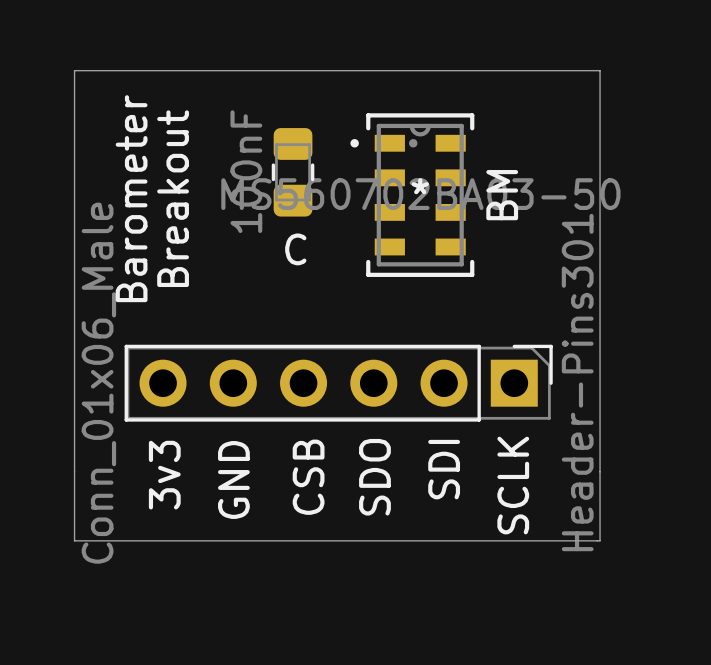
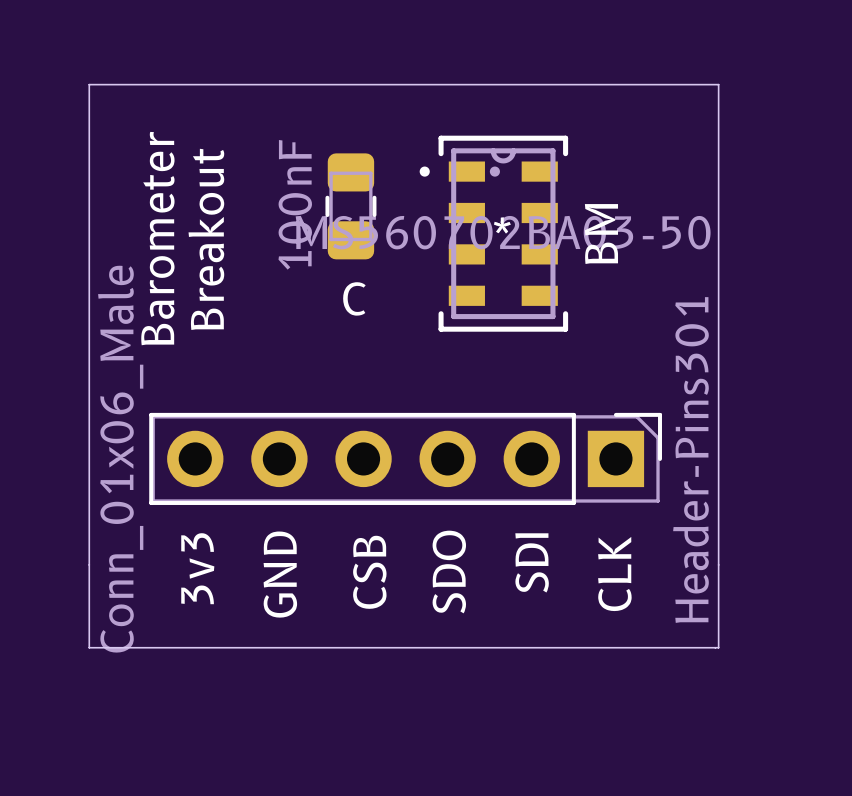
text: SCLK (513, 485) -> CLK (614, 574)

